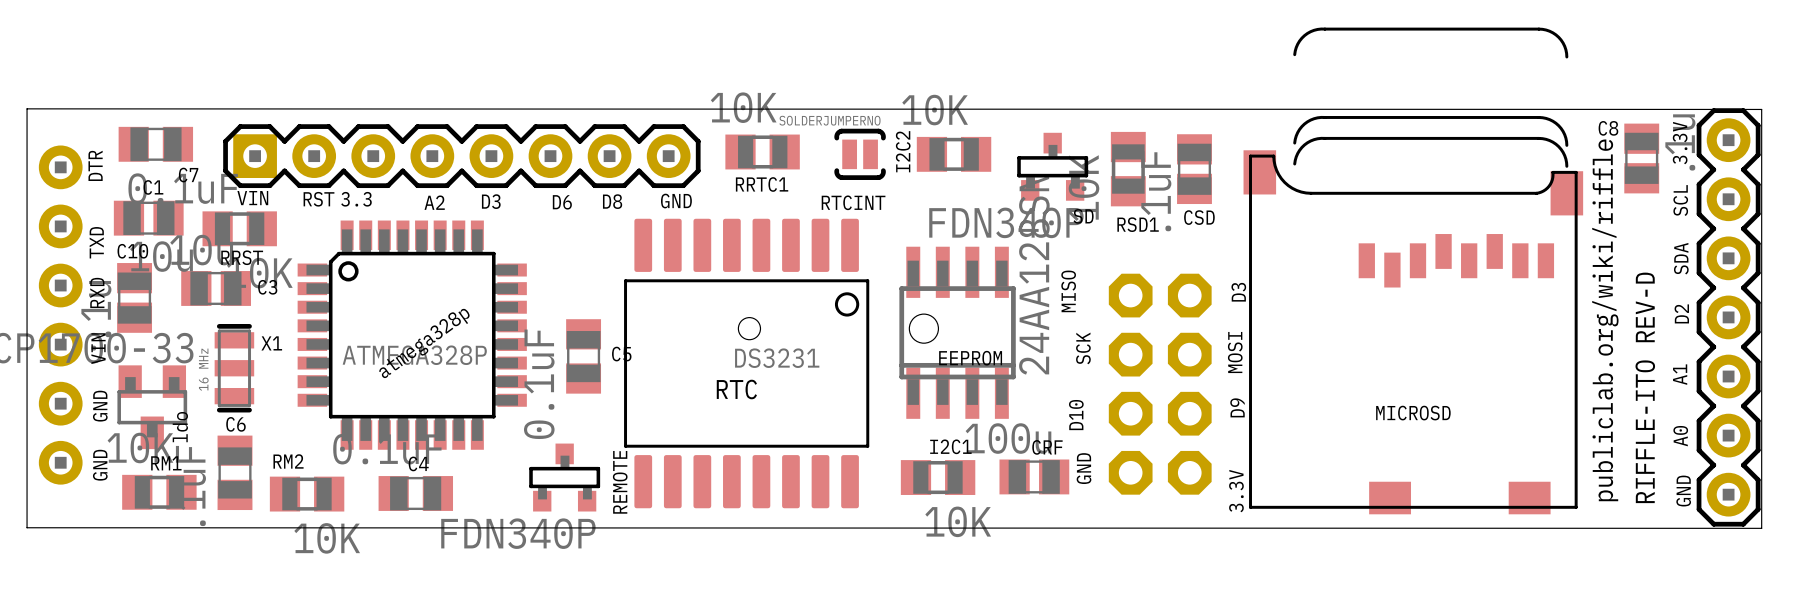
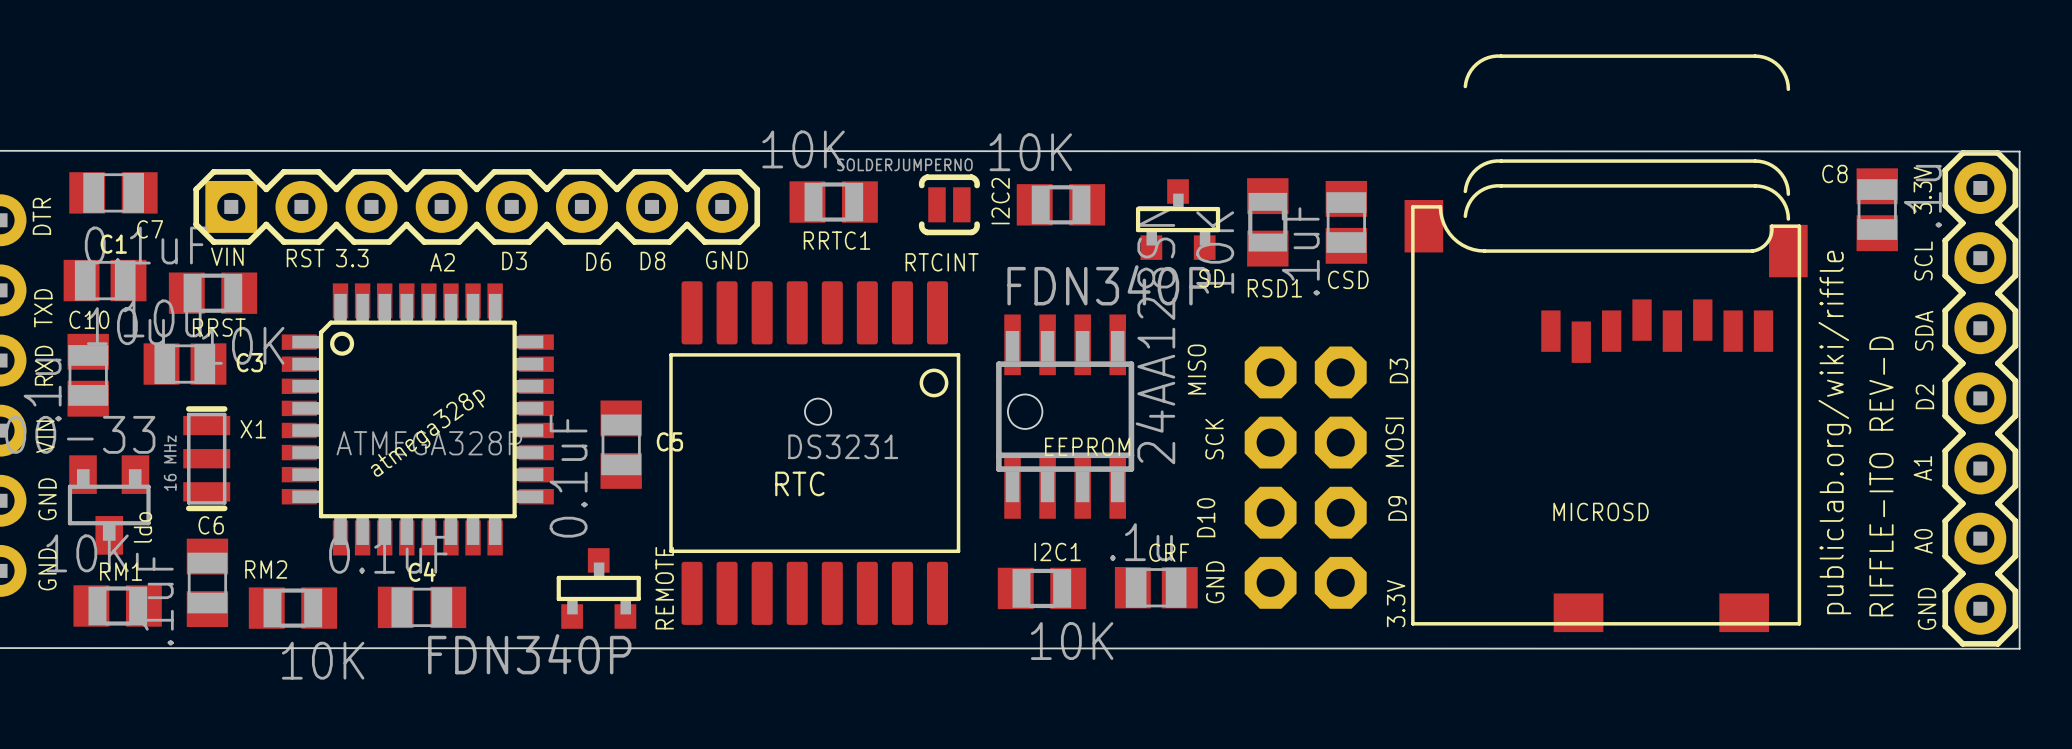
CRF value: 100u (1008, 438) -> .1u (1141, 542)

